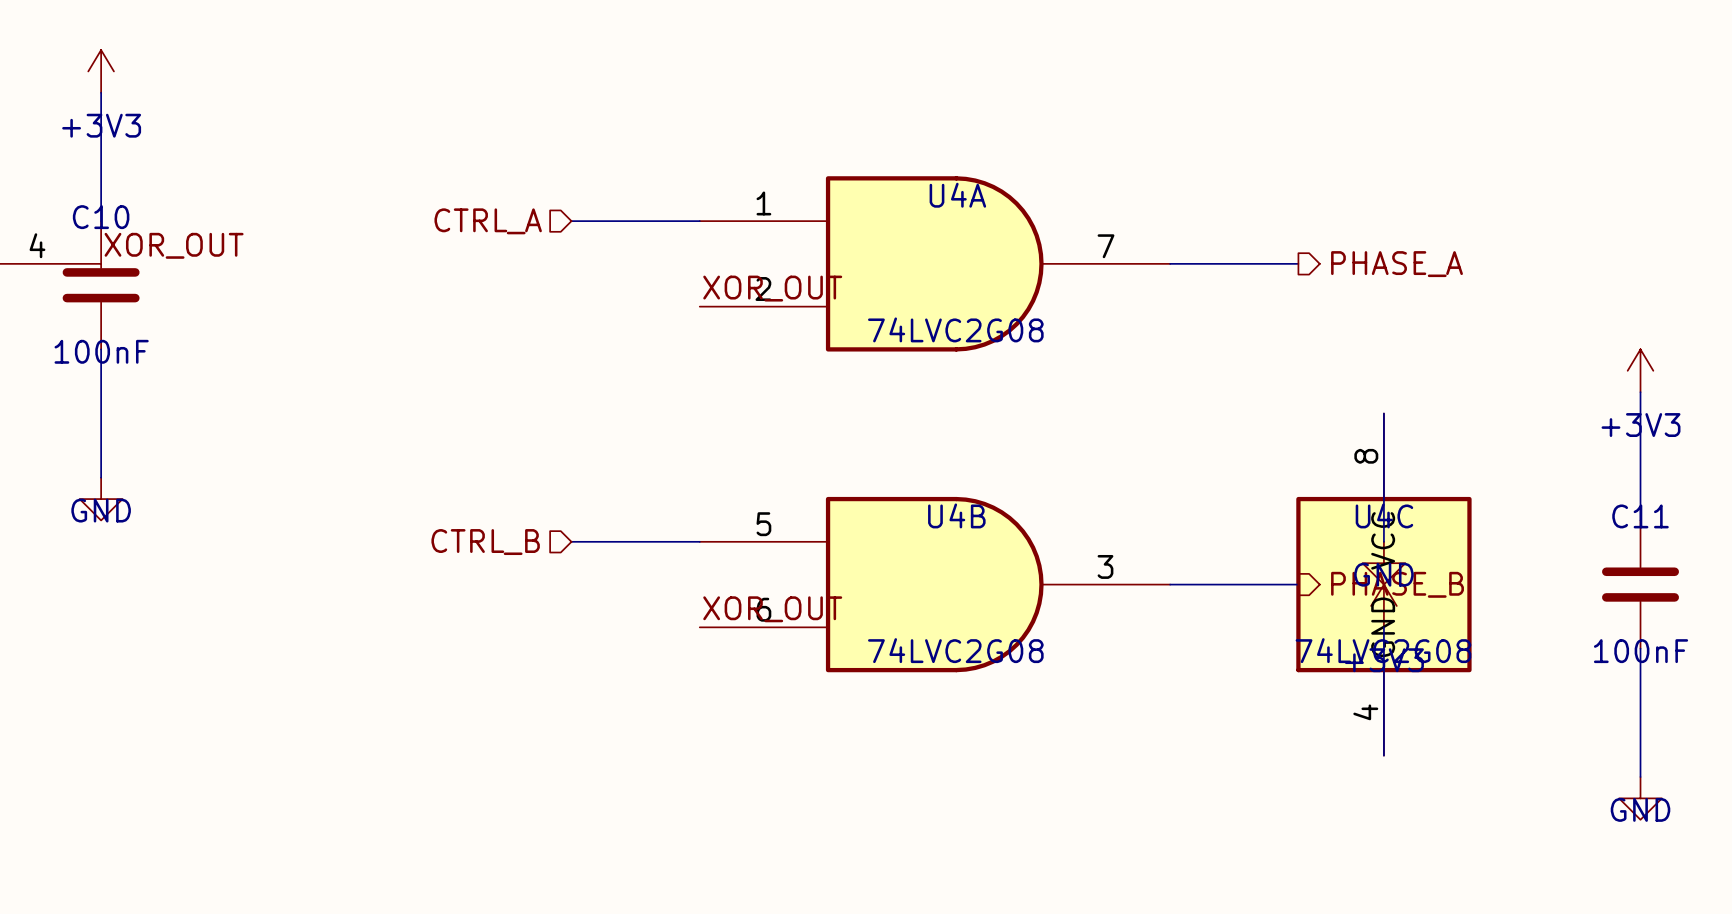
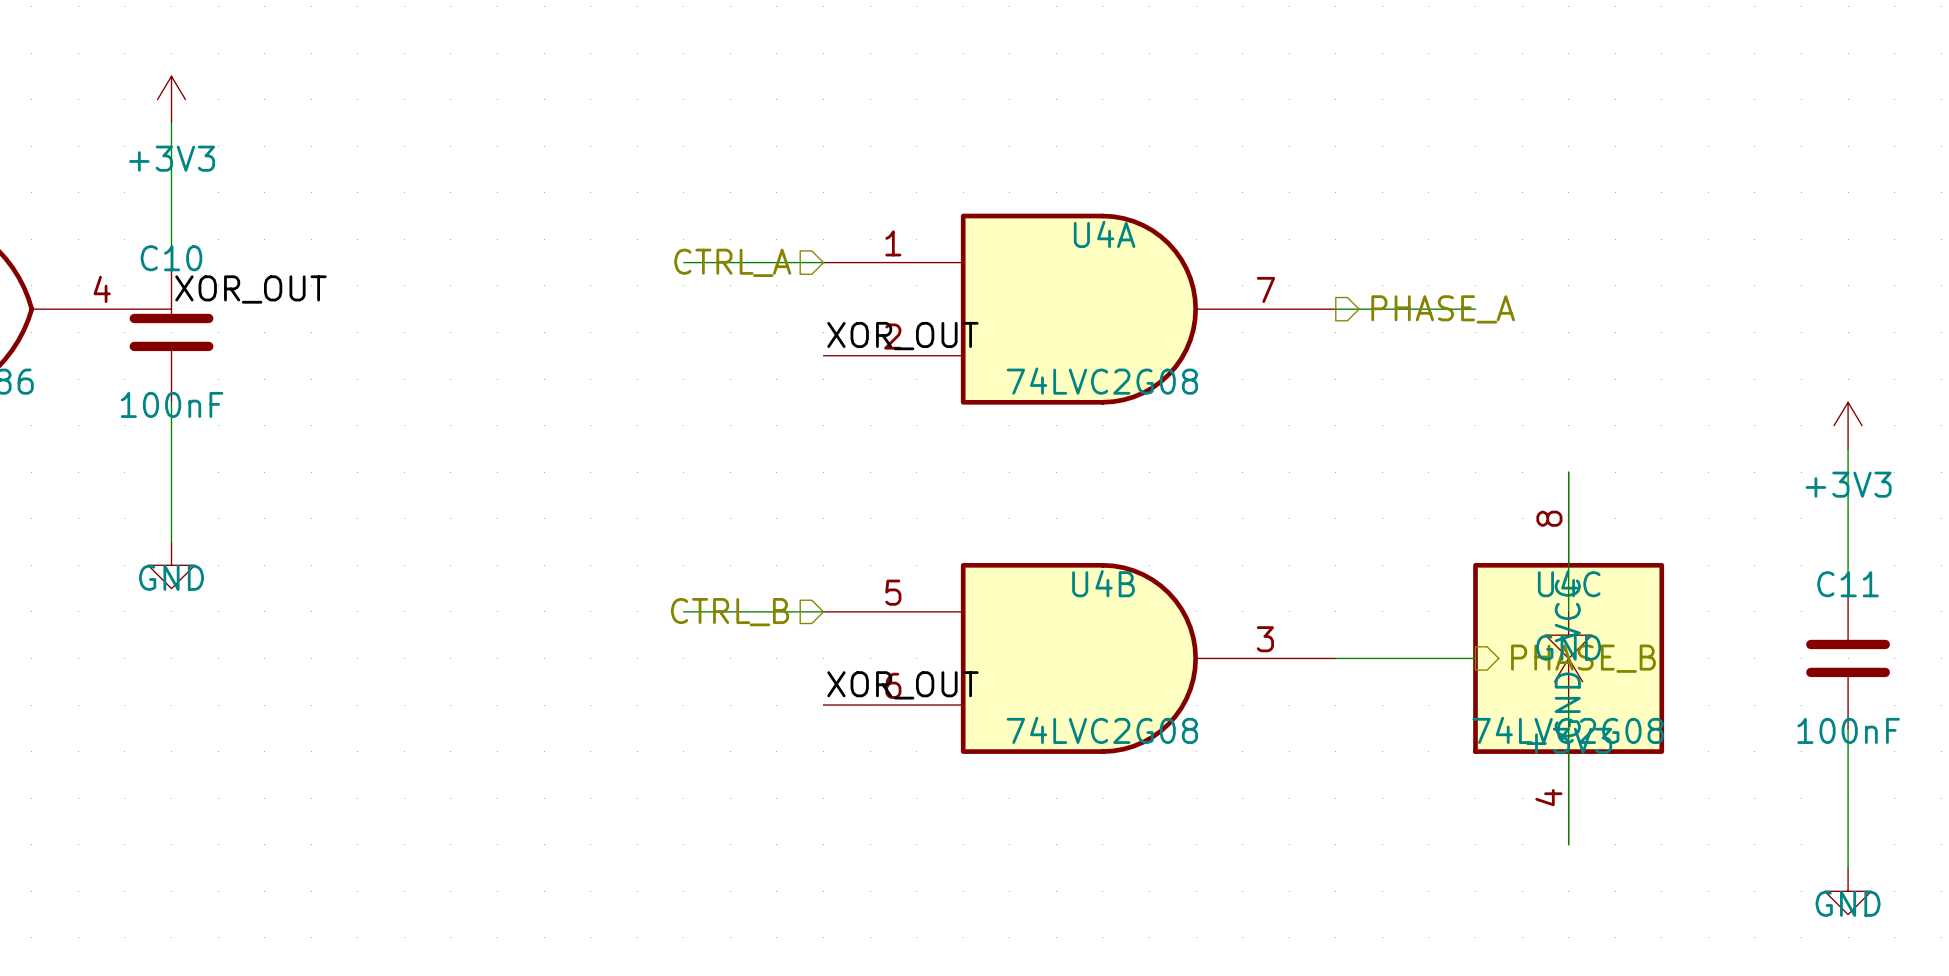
hierarchical label position: CTRL_A (488, 221) -> CTRL_A (732, 262)
hierarchical label position: PHASE_A (1397, 264) -> PHASE_A (1443, 309)
hierarchical label position: CTRL_B (485, 542) -> CTRL_B (729, 612)

